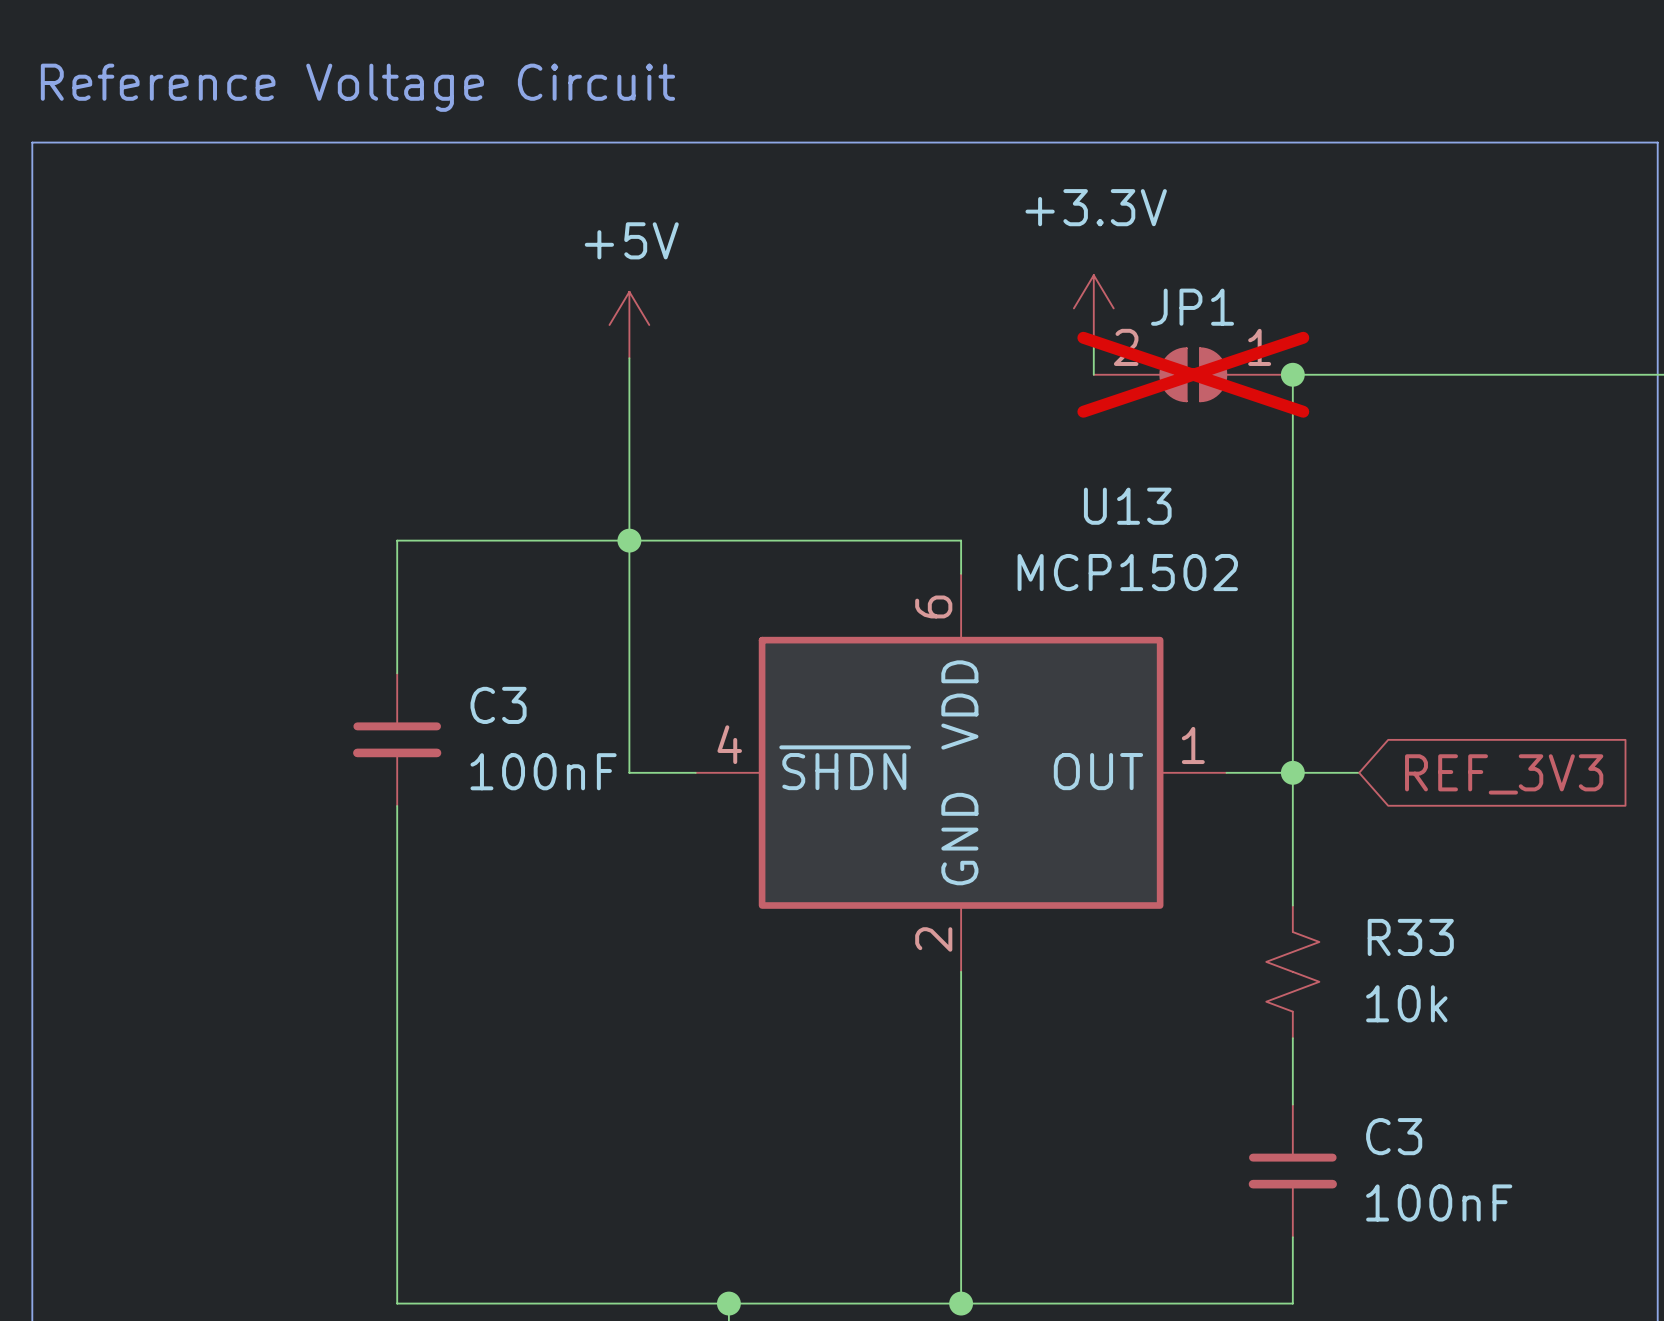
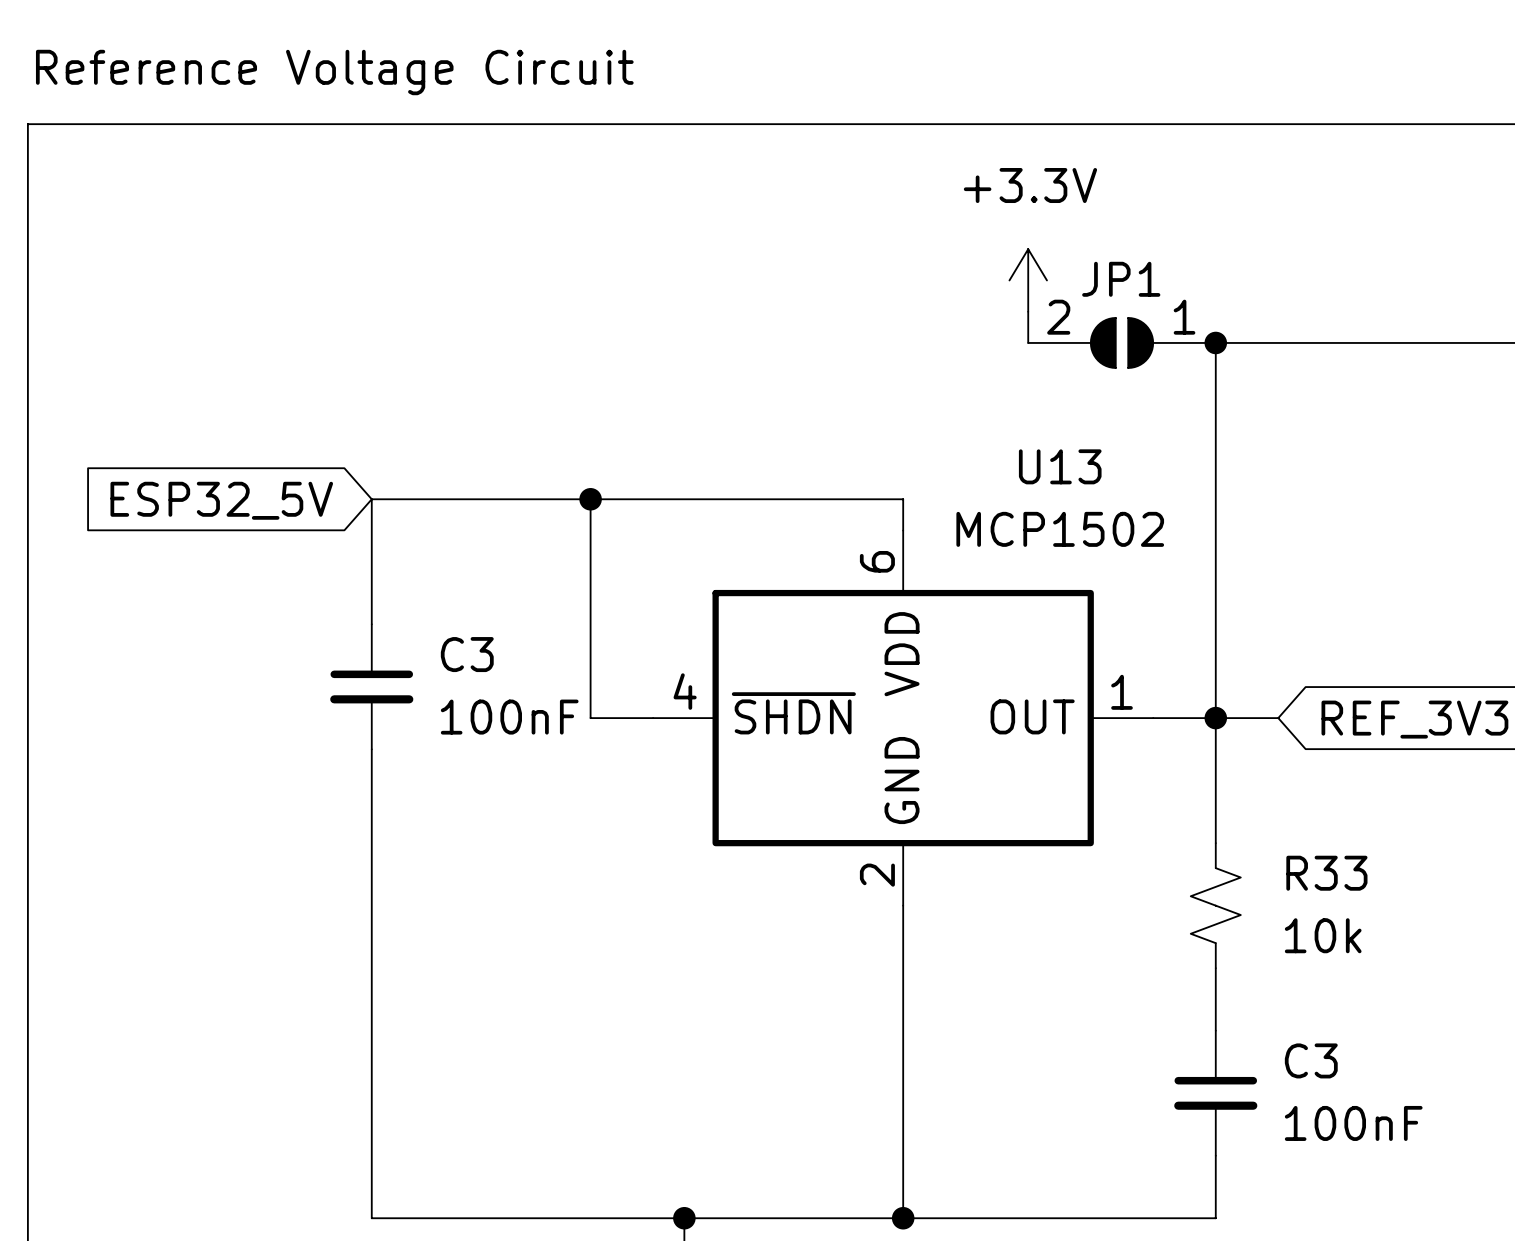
power symbol: +5V (629, 325) -> none
wire: (629, 358) (629, 540) -> none
JP1 do-not-place cross: (1193, 374) -> none
global label: none -> ESP32_5V (221, 500)

